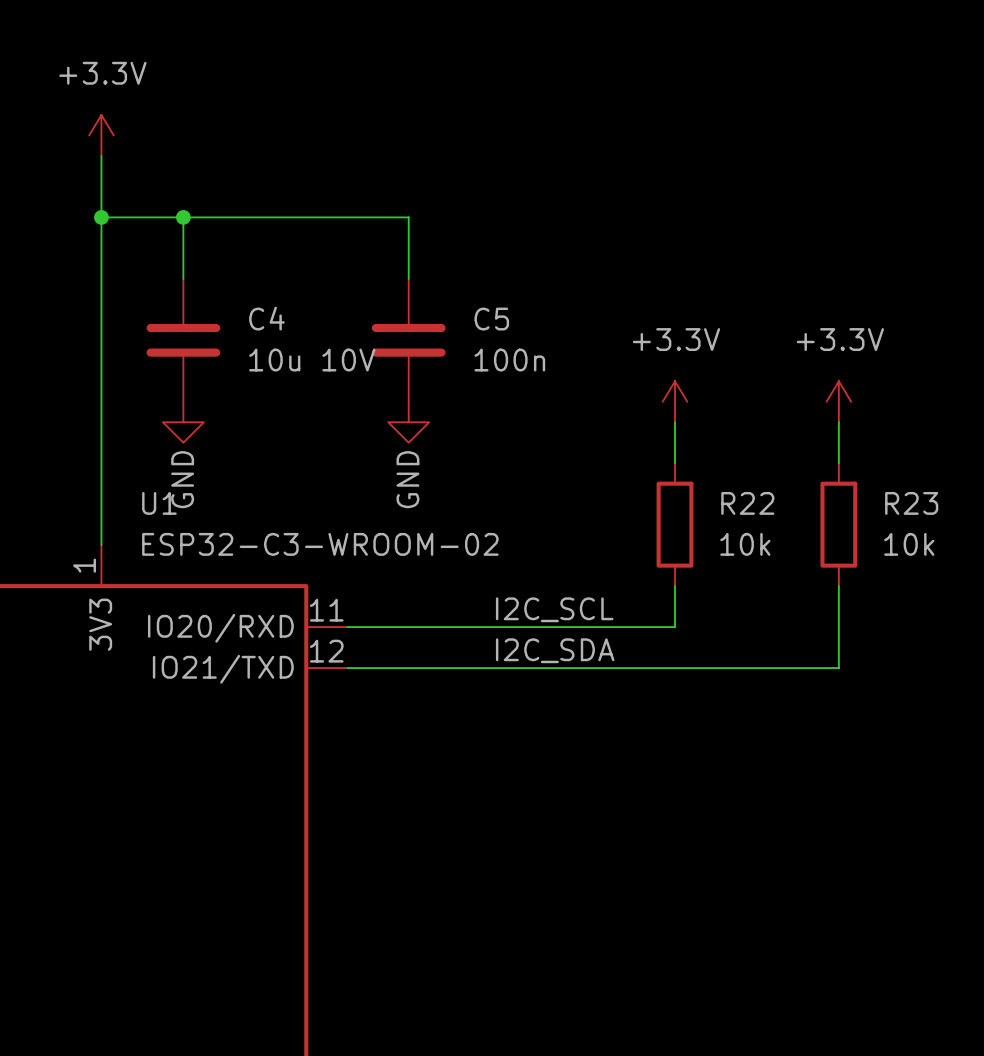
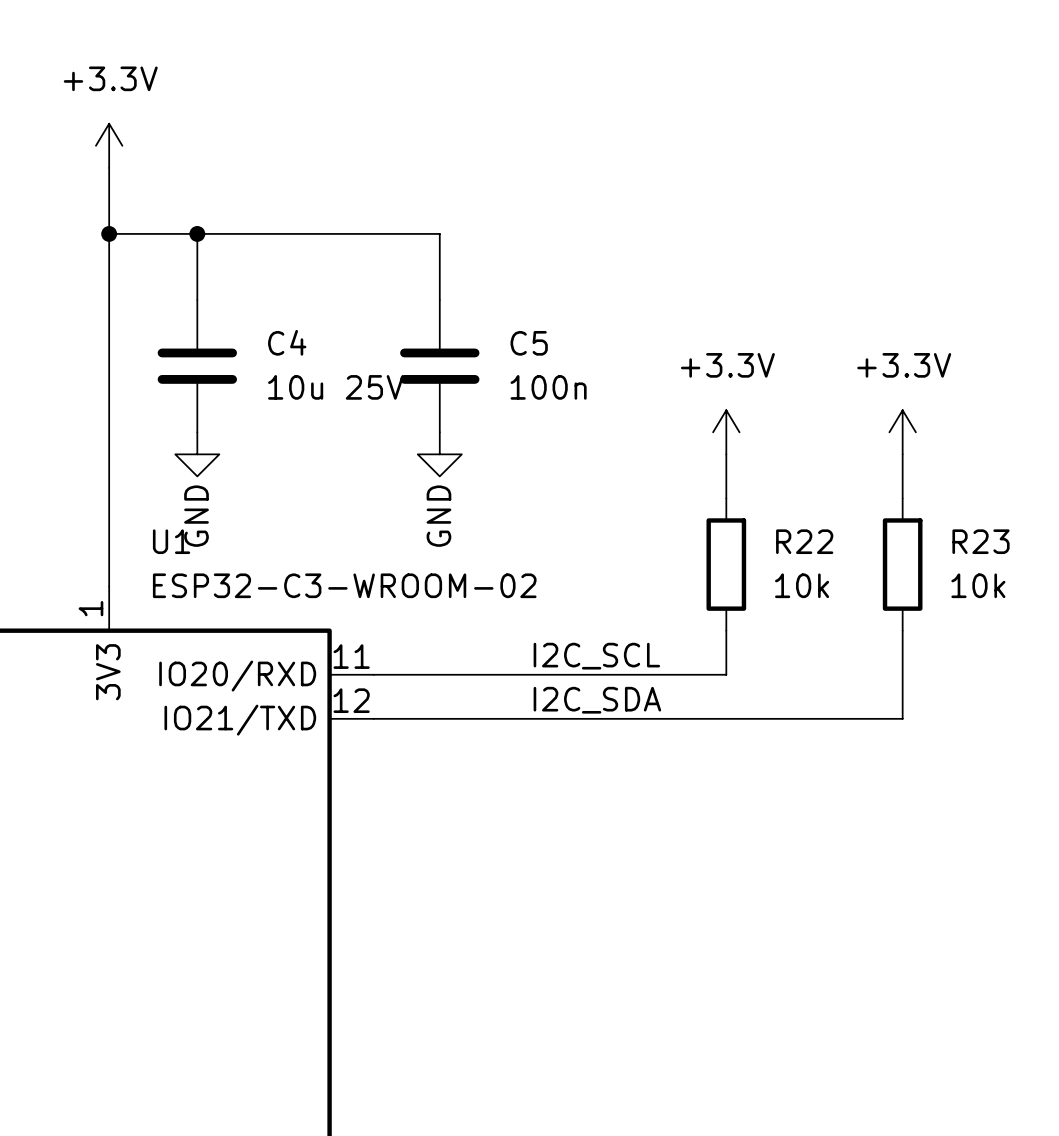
C4 value: 10u 10V (312, 360) -> 10u 25V (336, 387)

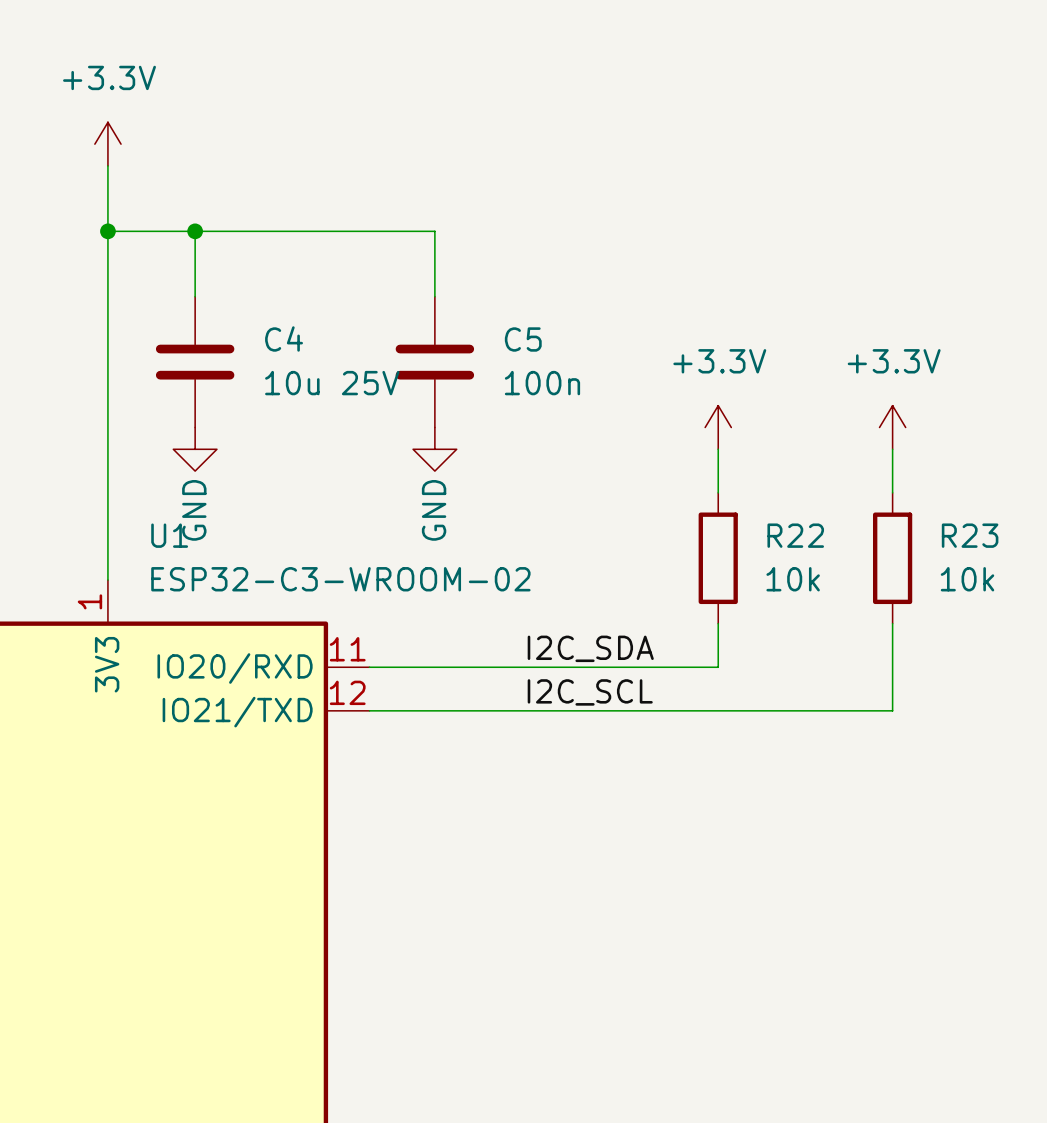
label: I2C_SCL (596, 656) -> I2C_SDA (590, 648)
label: I2C_SDA (597, 700) -> I2C_SCL (590, 692)

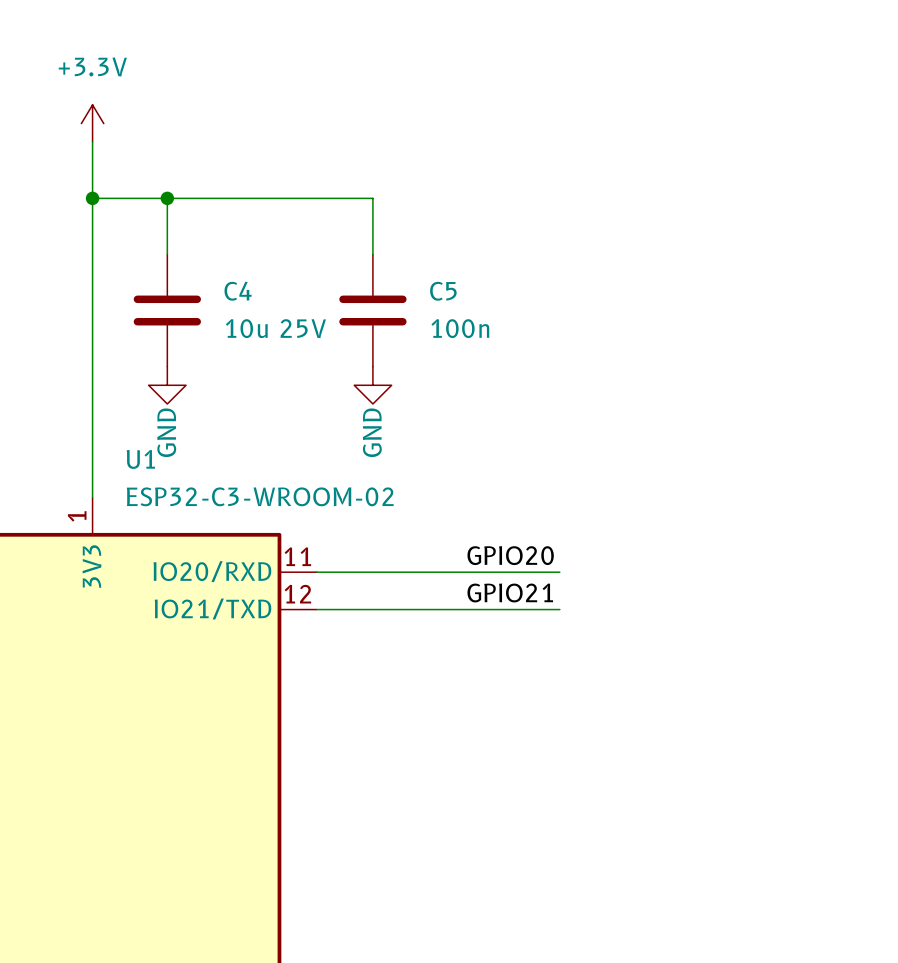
power symbol: +3.3V (718, 427) -> none
power symbol: +3.3V (892, 427) -> none
wire: (718, 449) (718, 492) -> none
wire: (892, 449) (892, 492) -> none
R22: 10k (718, 558) -> none
R23: 10k (892, 558) -> none
wire: (718, 623) (718, 667) (652, 667) -> none
wire: (892, 623) (892, 710) (652, 710) -> none
label: none -> GPIO20 (510, 555)
label: I2C_SDA (590, 648) -> none
label: none -> GPIO21 (510, 592)
label: I2C_SCL (590, 692) -> none

